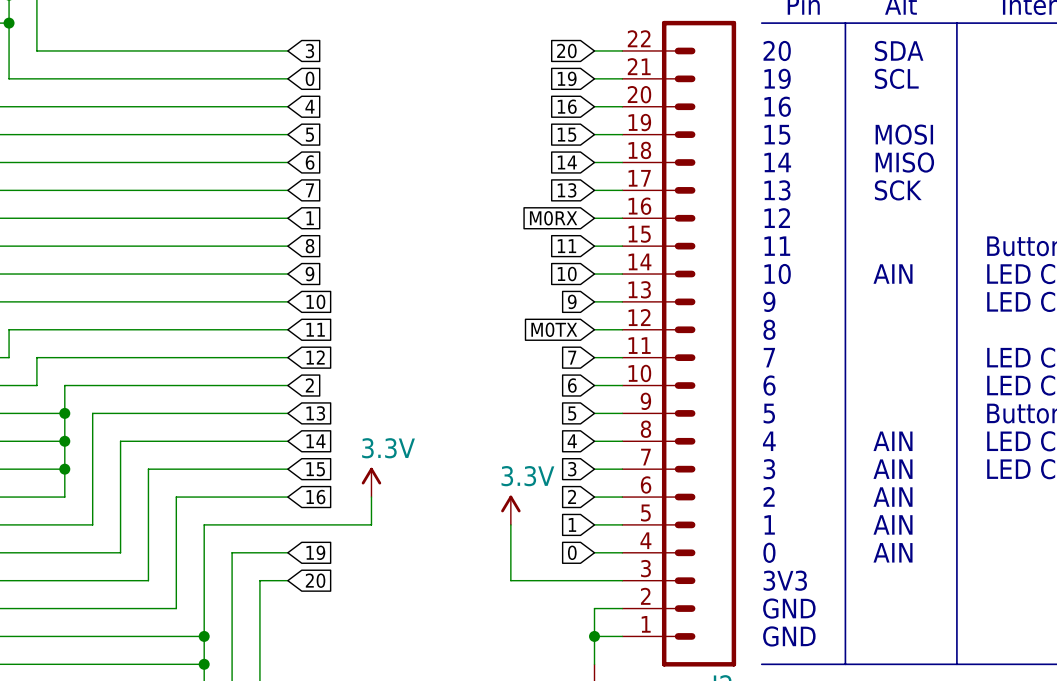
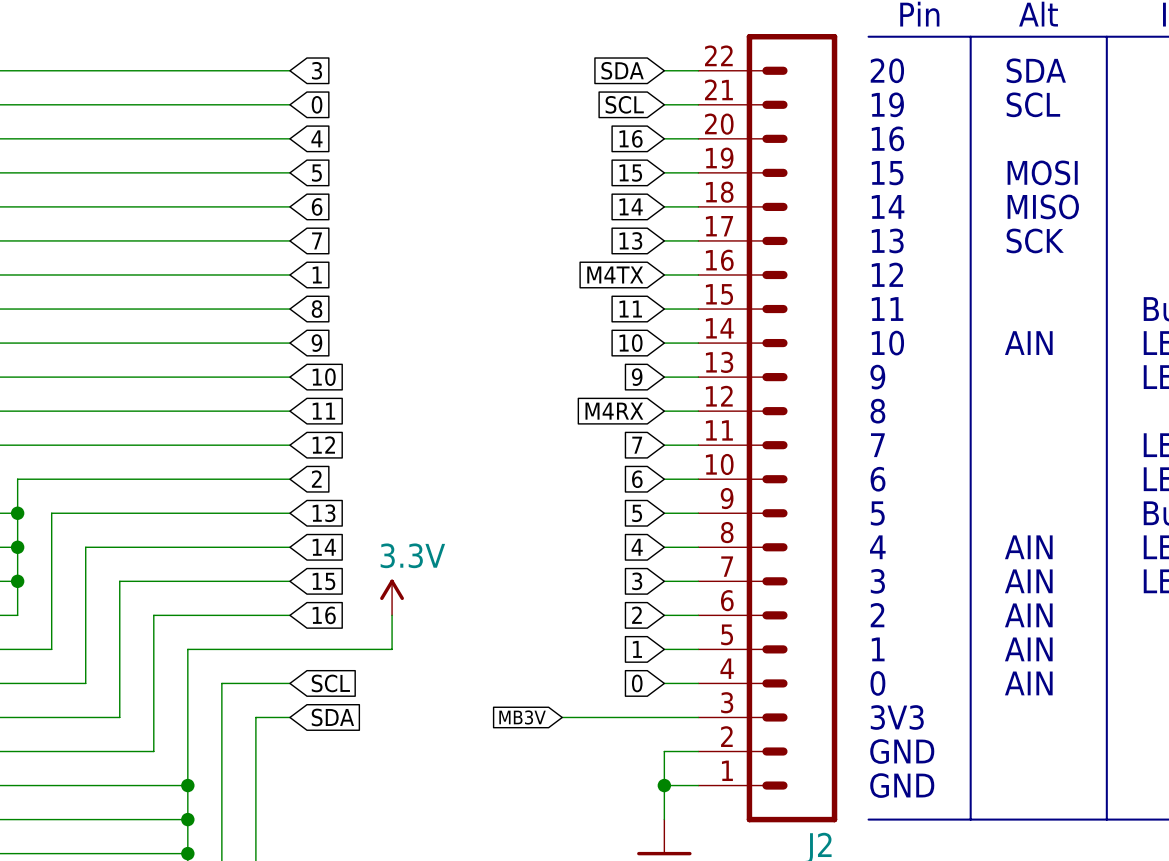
global label: 20 (566, 50) -> SDA (622, 70)
global label: 19 (567, 78) -> SCL (624, 104)
global label: M0RX (553, 218) -> M4TX (615, 274)
global label: M0TX (554, 329) -> M4RX (614, 411)
power symbol: 3.3V (510, 510) -> none
wire: (510, 524) (510, 580) -> none
global label: 19 (315, 552) -> SCL (330, 683)
global label: 20 (315, 580) -> SDA (332, 717)
global label: none -> MB3V (522, 717)

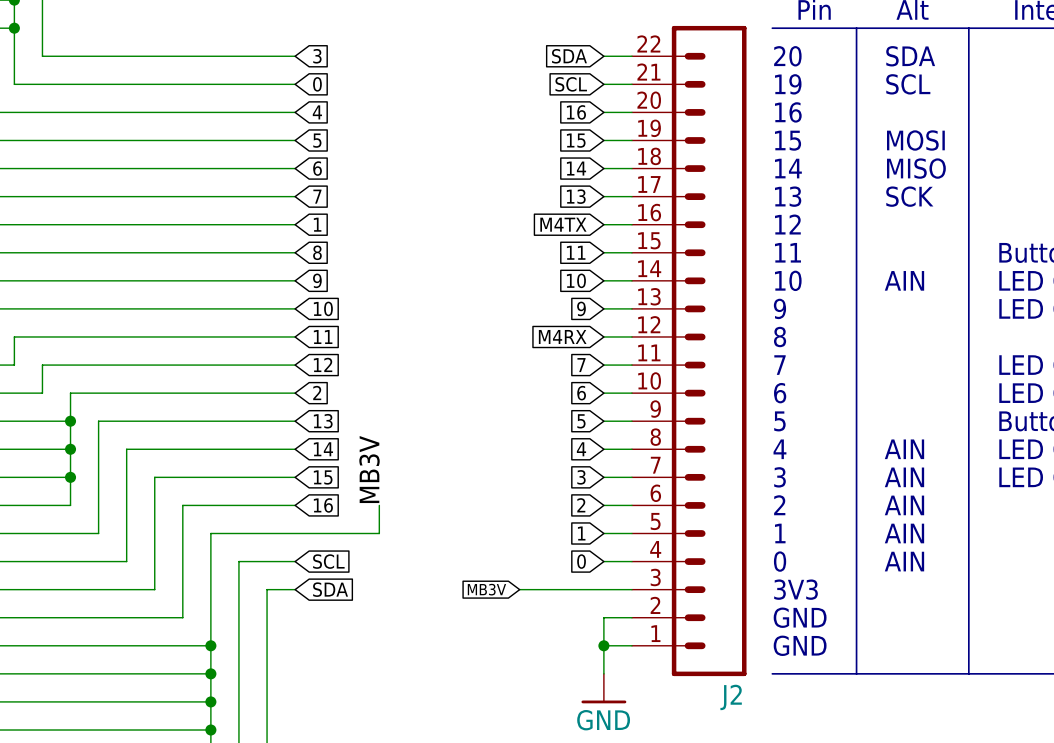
label: none -> MB3V (369, 469)
power symbol: 3.3V (392, 597) -> none

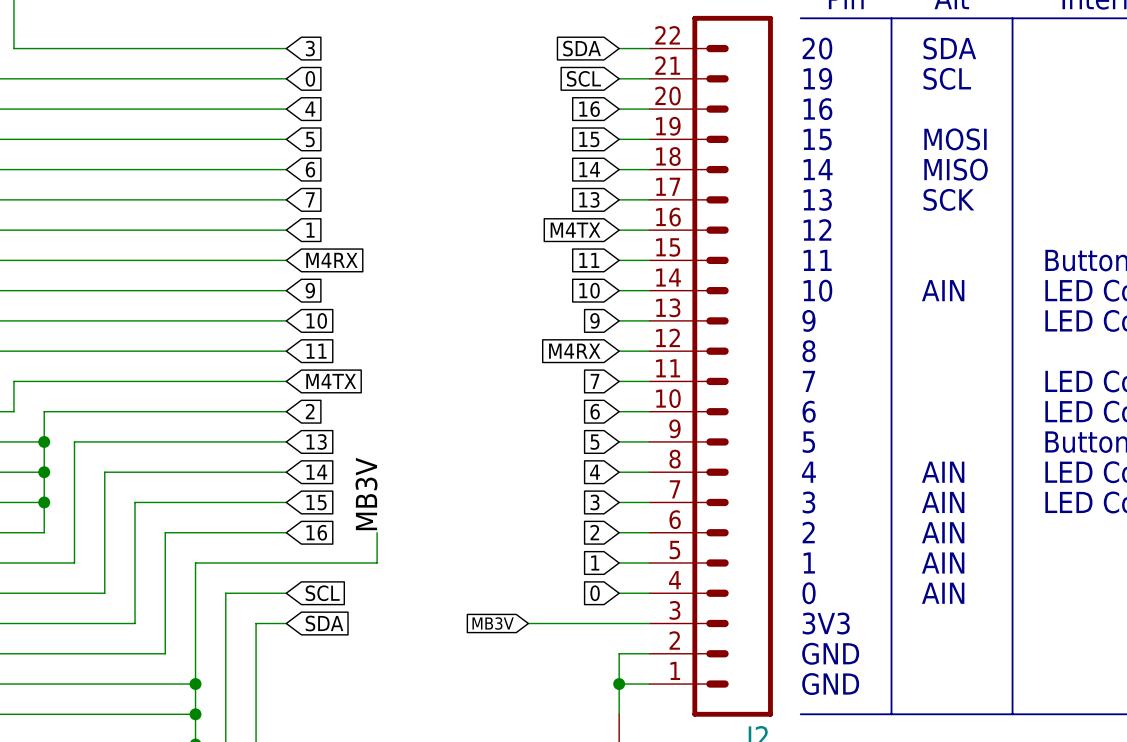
global label: 8 (317, 252) -> M4RX (331, 260)
global label: 12 (323, 364) -> M4TX (331, 381)

